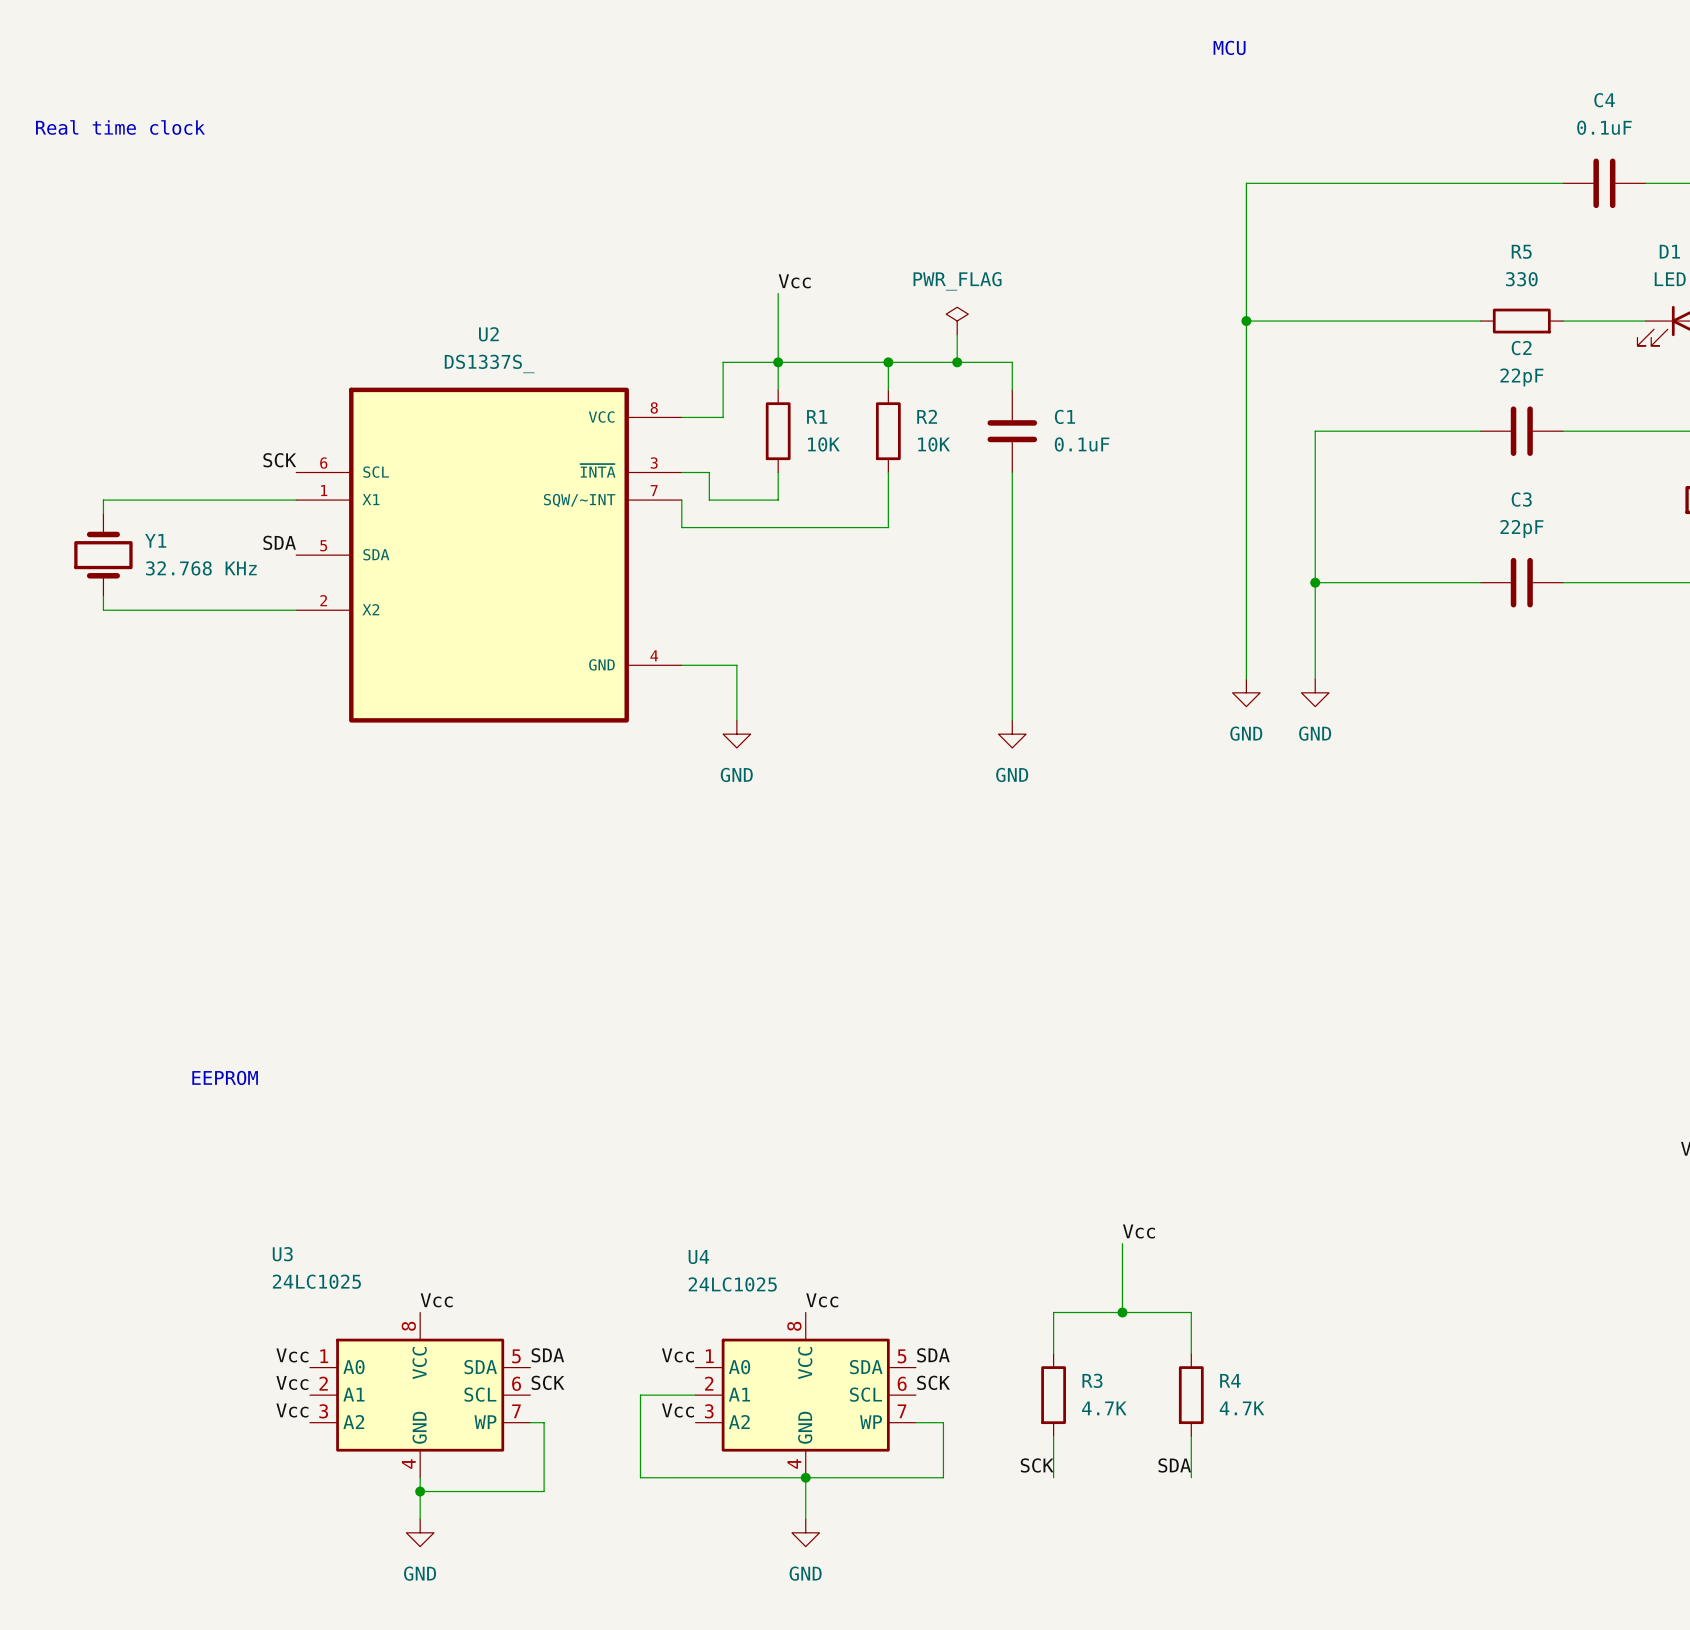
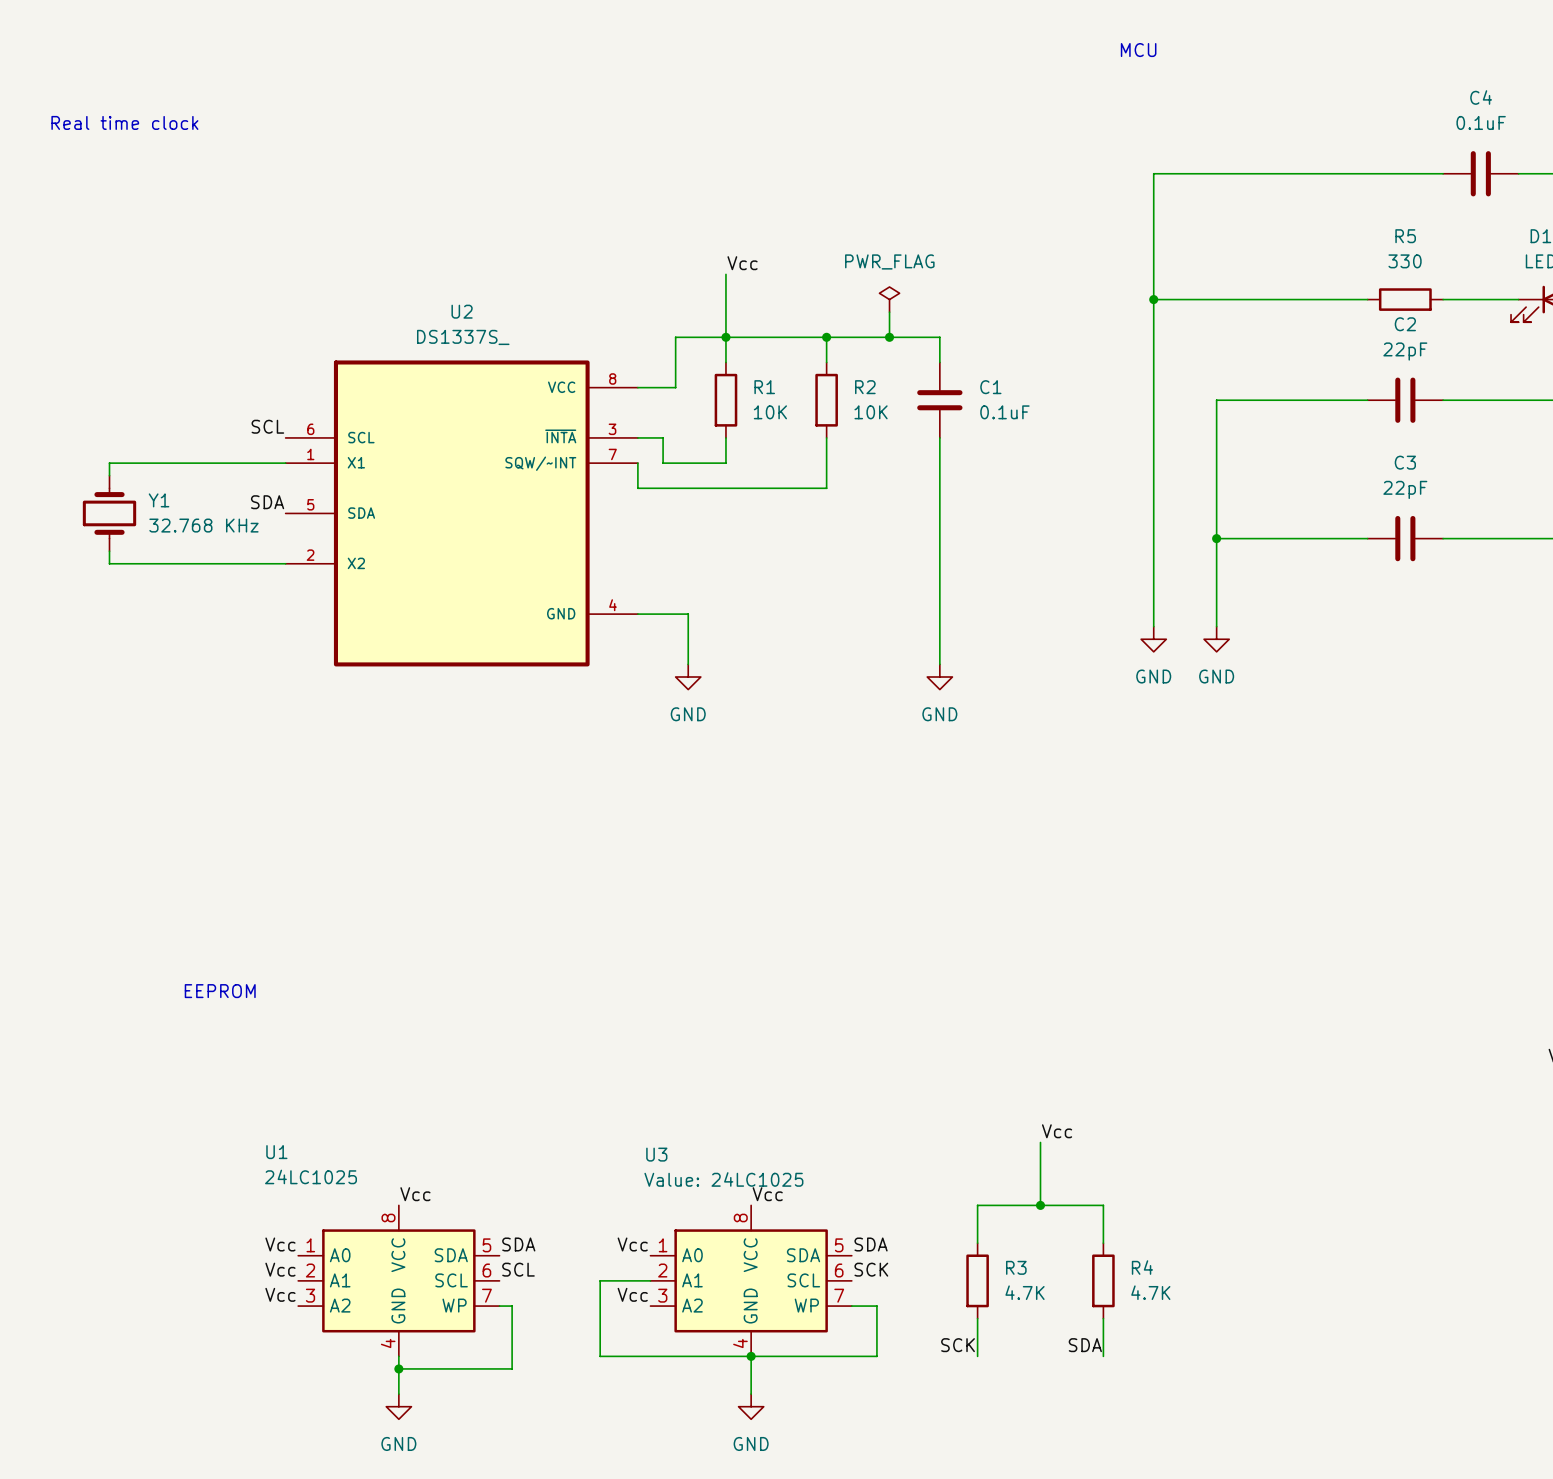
label: SCK (279, 460) -> SCL (267, 426)
U3 name: U3 (282, 1254) -> U1 (276, 1152)
U4 name: U4 (698, 1257) -> U3 (656, 1154)
U4 value: 24LC1025 (732, 1284) -> Value: 24LC1025 (723, 1179)
label: SCK (547, 1382) -> SCL (518, 1269)

